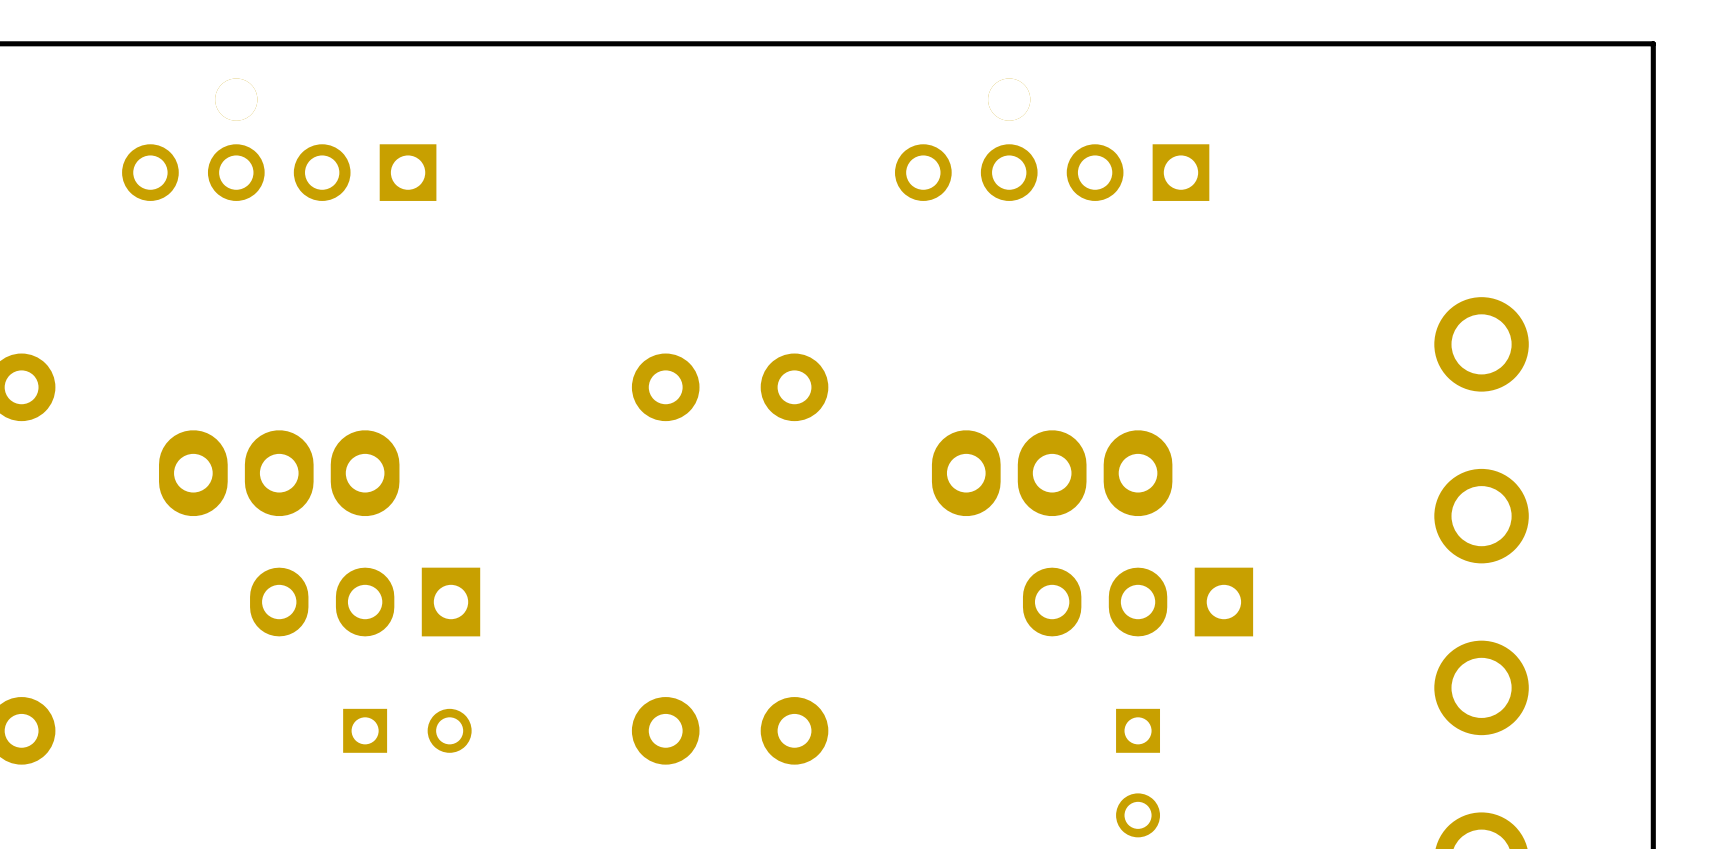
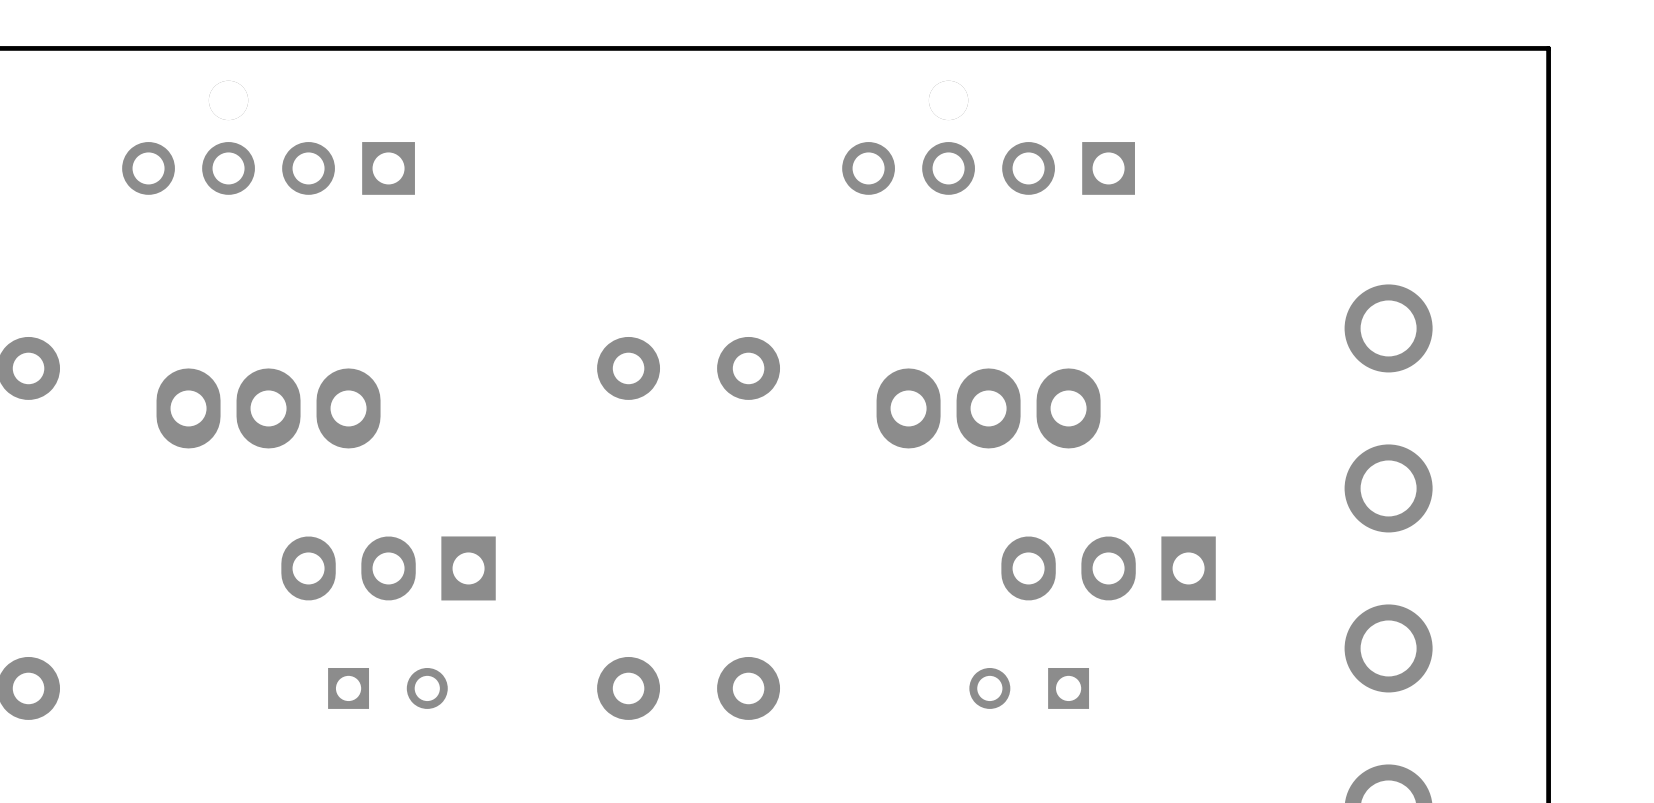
part position: (279, 473) -> (268, 408)
part position: (1052, 473) -> (988, 408)
part position: (365, 602) -> (388, 568)
part position: (1138, 602) -> (1108, 568)
part rotation: 0° (1138, 773) -> 90° clockwise (1029, 688)

